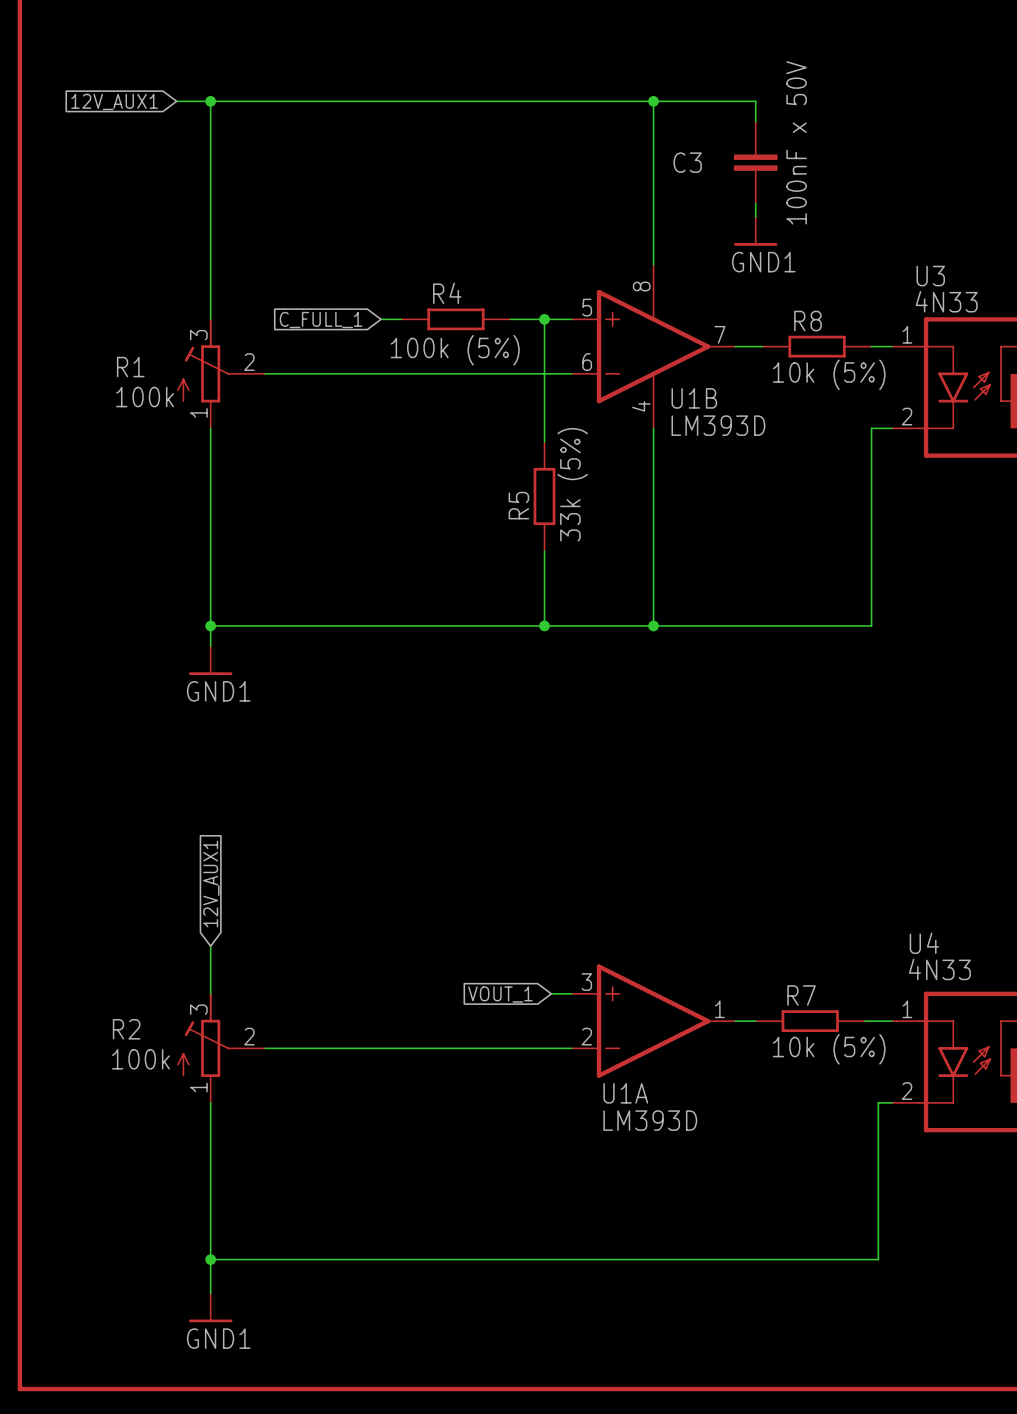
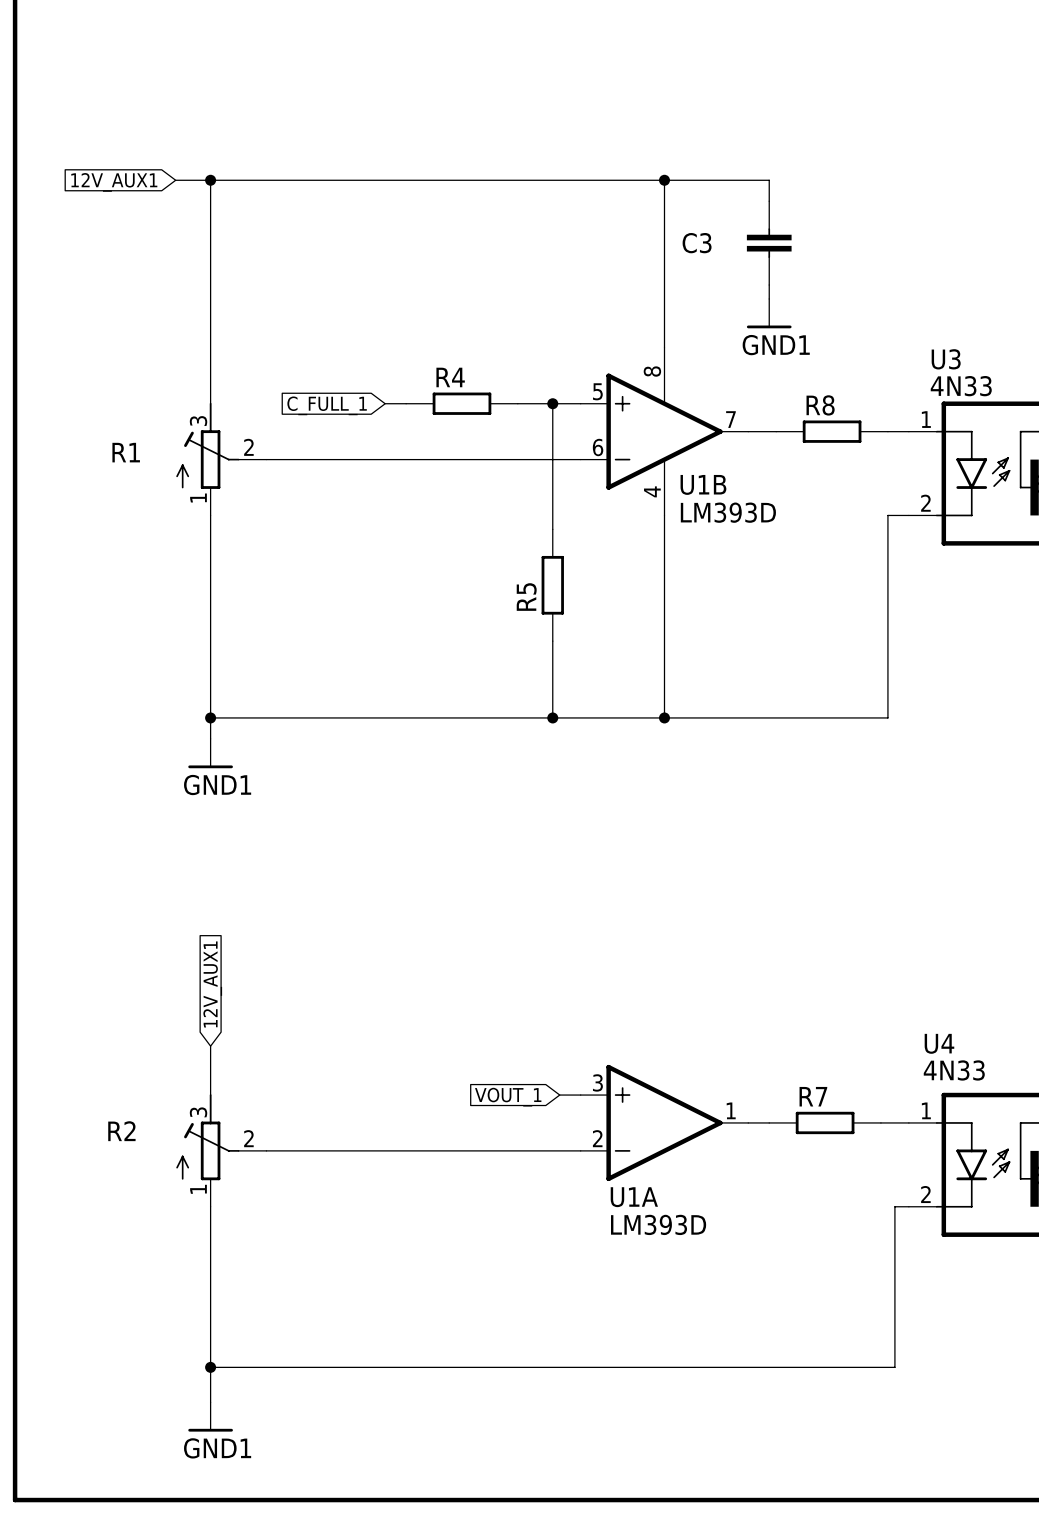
C3 value: 100nF x 50V (796, 142) -> none
R4 value: 100k (5%) (455, 350) -> none
R8 value: 10k (5%) (829, 374) -> none
R1 value: 100k (145, 397) -> none
R5 value: 33k (5%) (572, 484) -> none
R7 value: 10k (5%) (829, 1049) -> none
R2 value: 100k (140, 1059) -> none

